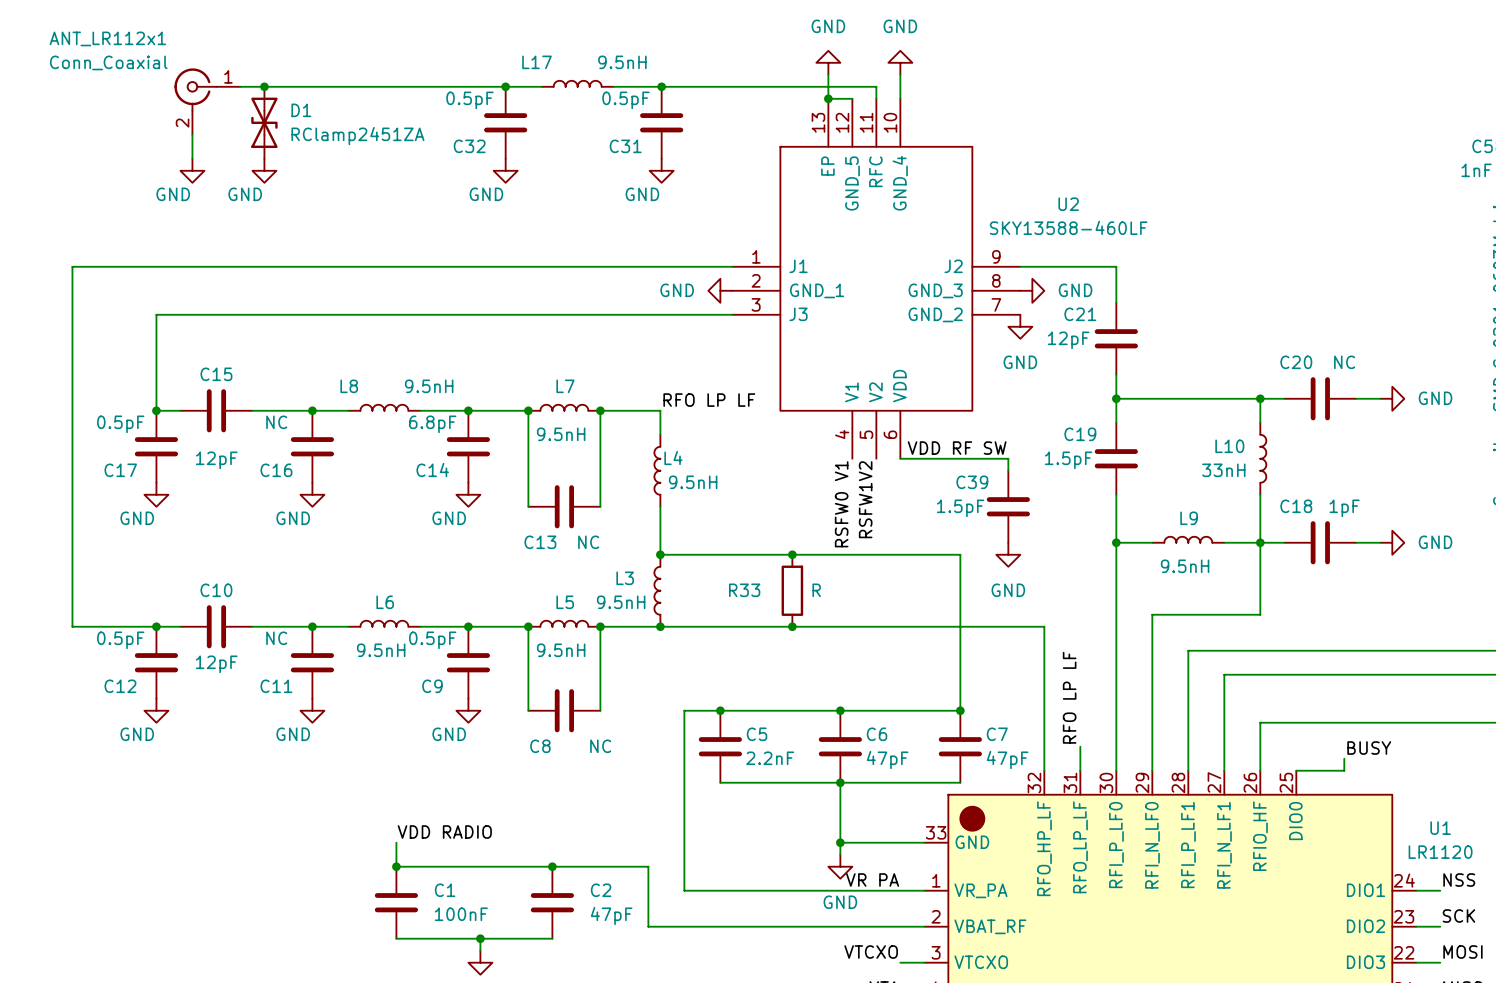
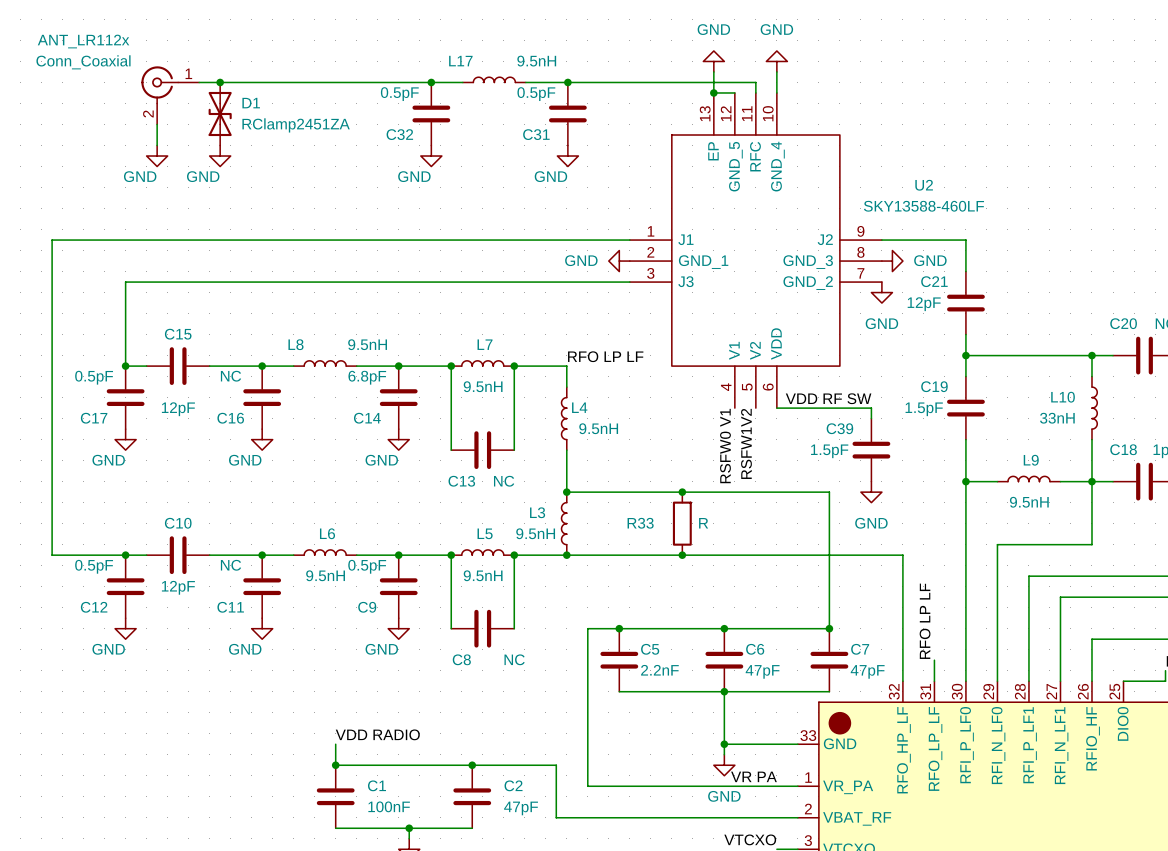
ANT_LR112x1 name: ANT_LR112x1 (107, 38) -> ANT_LR112x (83, 41)

